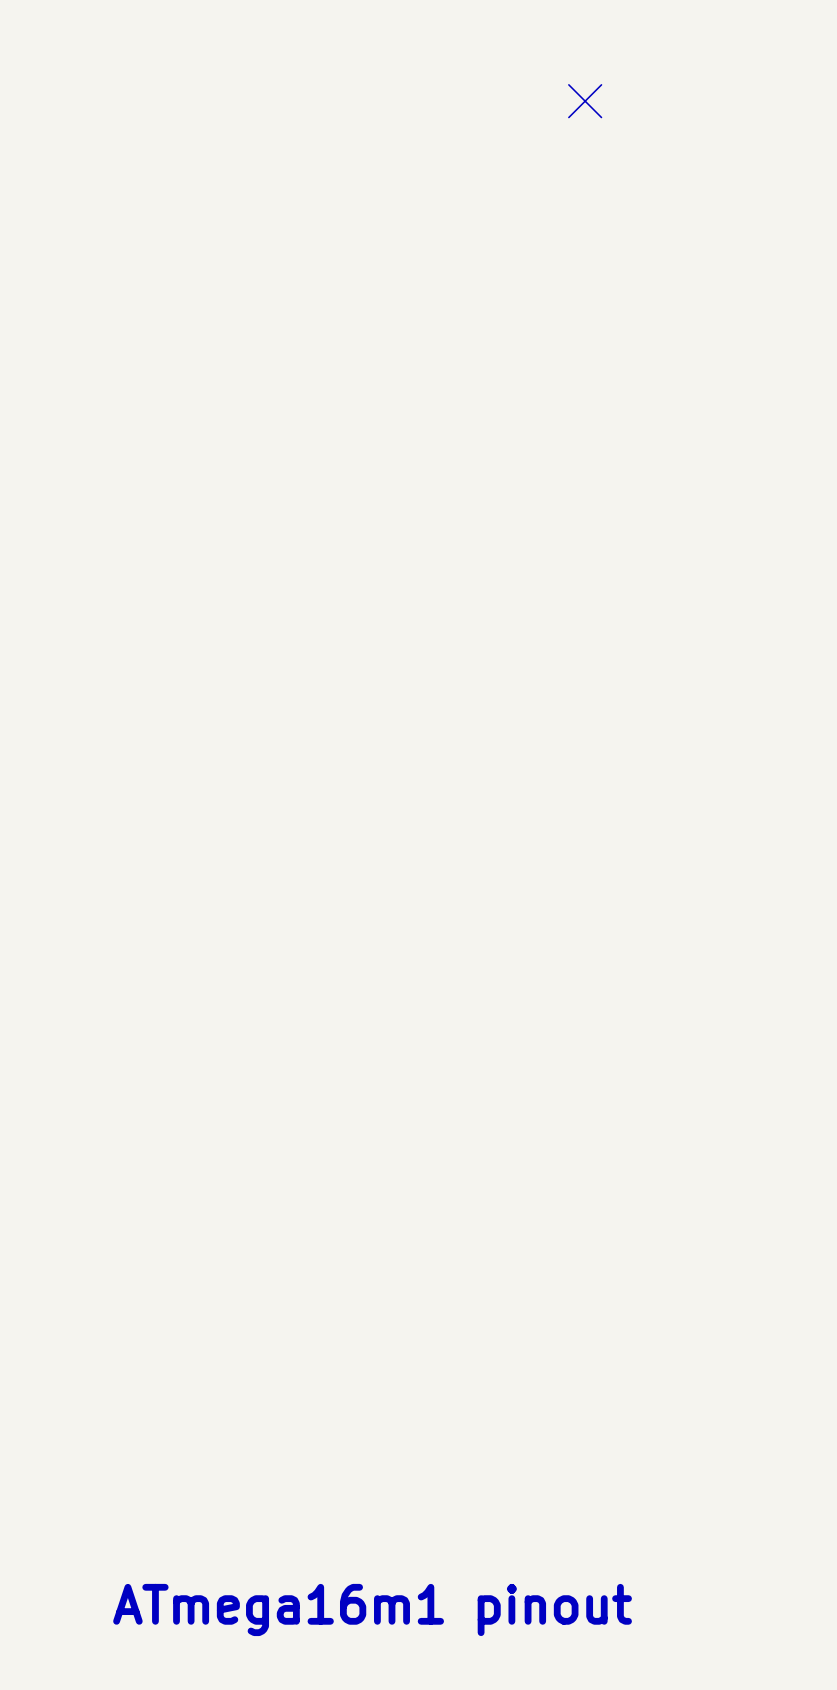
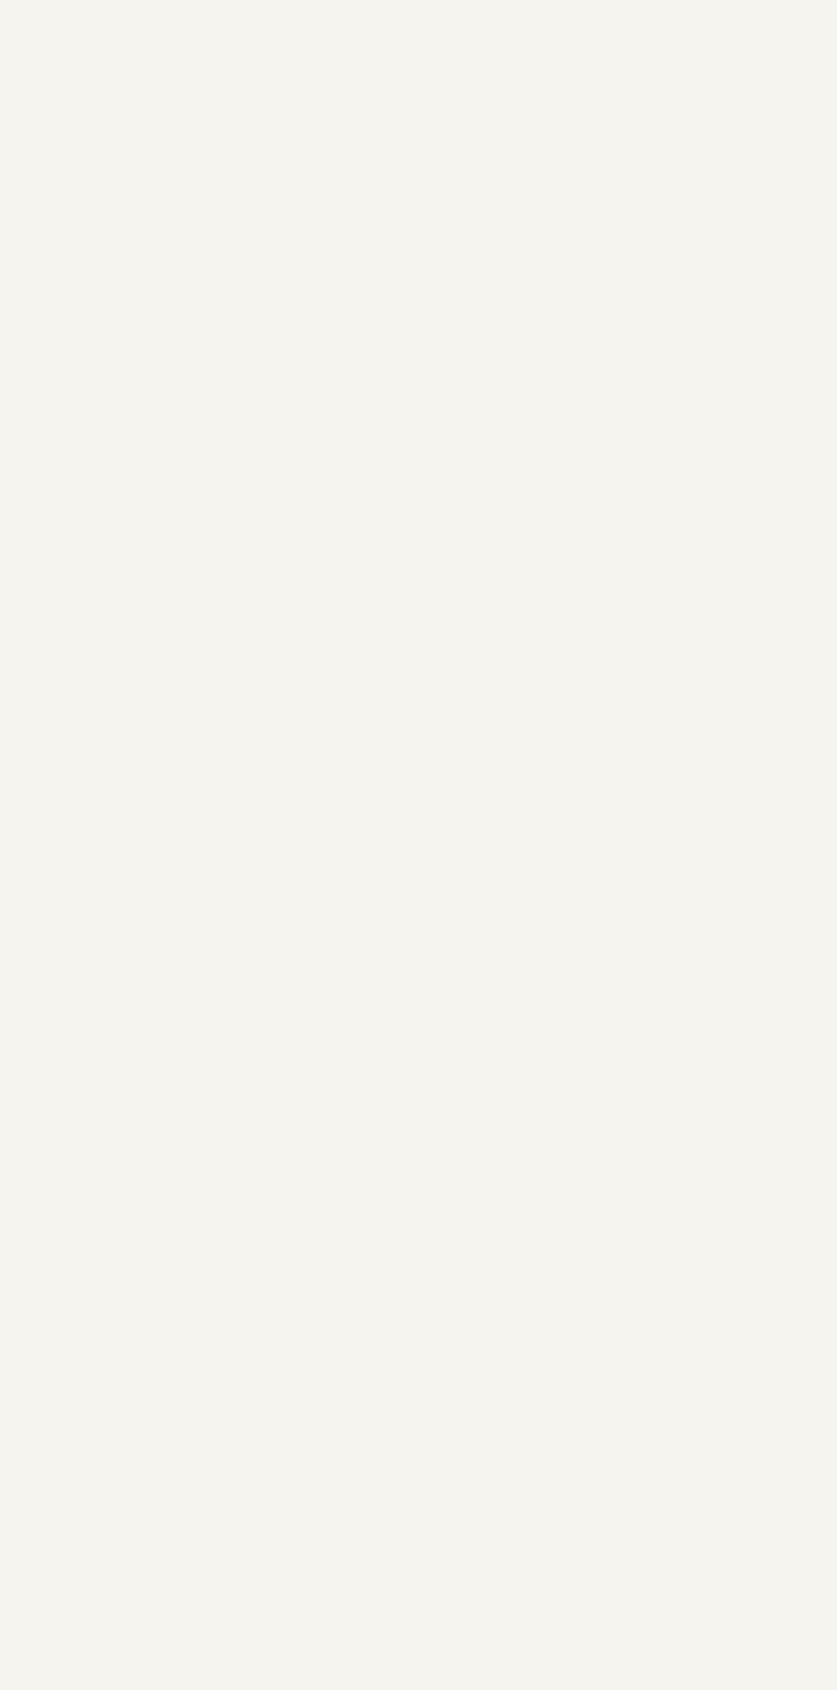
no-connect mark: (585, 101) -> none
text: ATmega16m1 pinout (372, 1609) -> none

